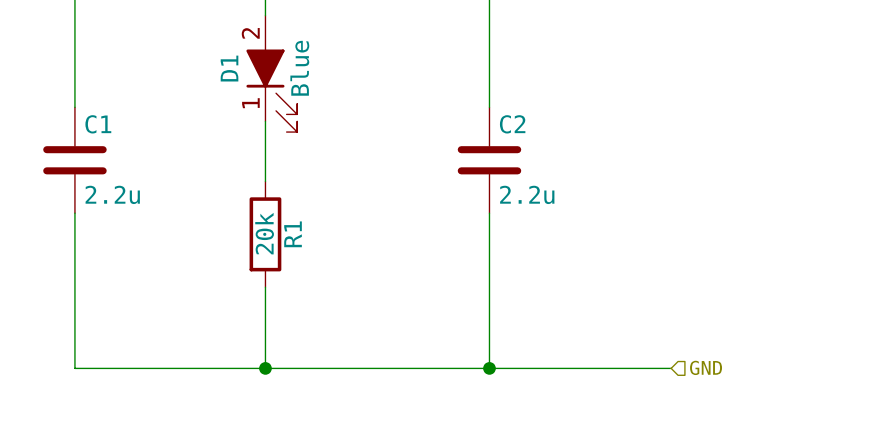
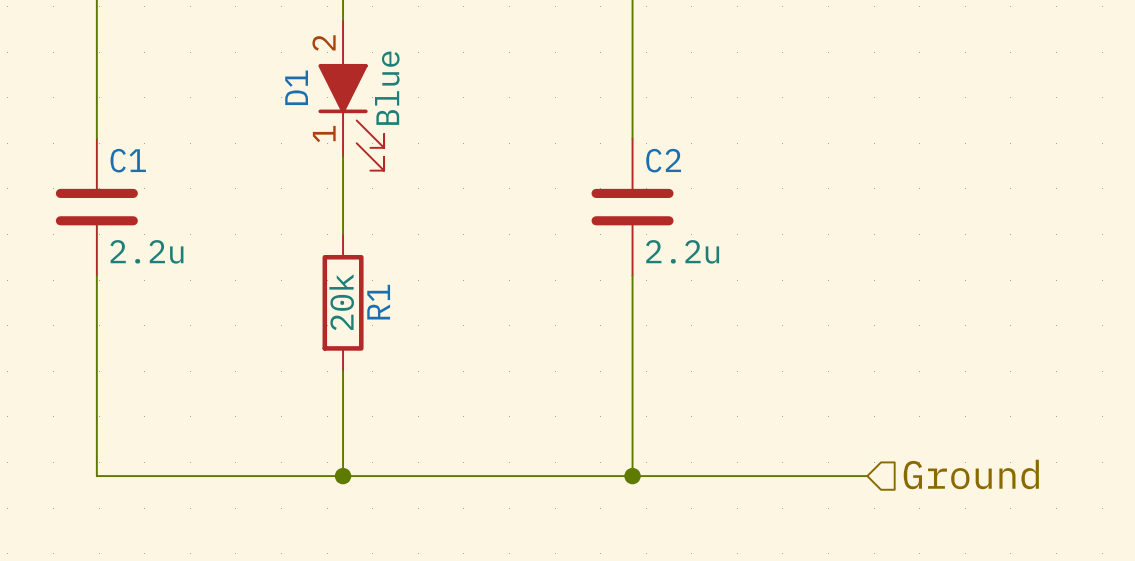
hierarchical label: GND (706, 367) -> Ground (971, 474)

